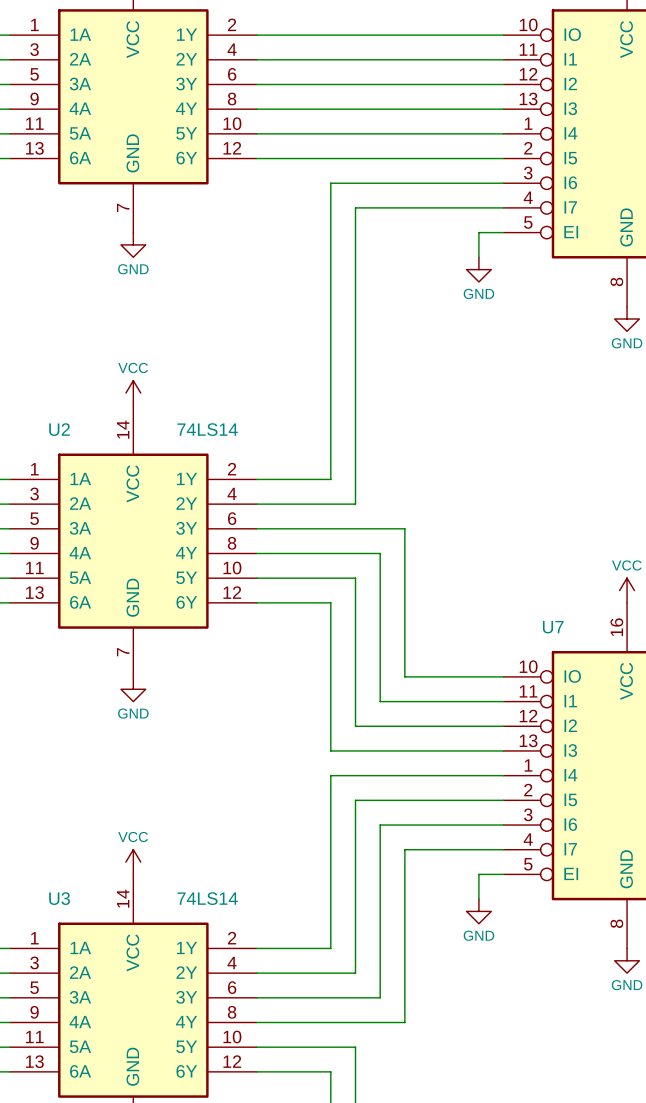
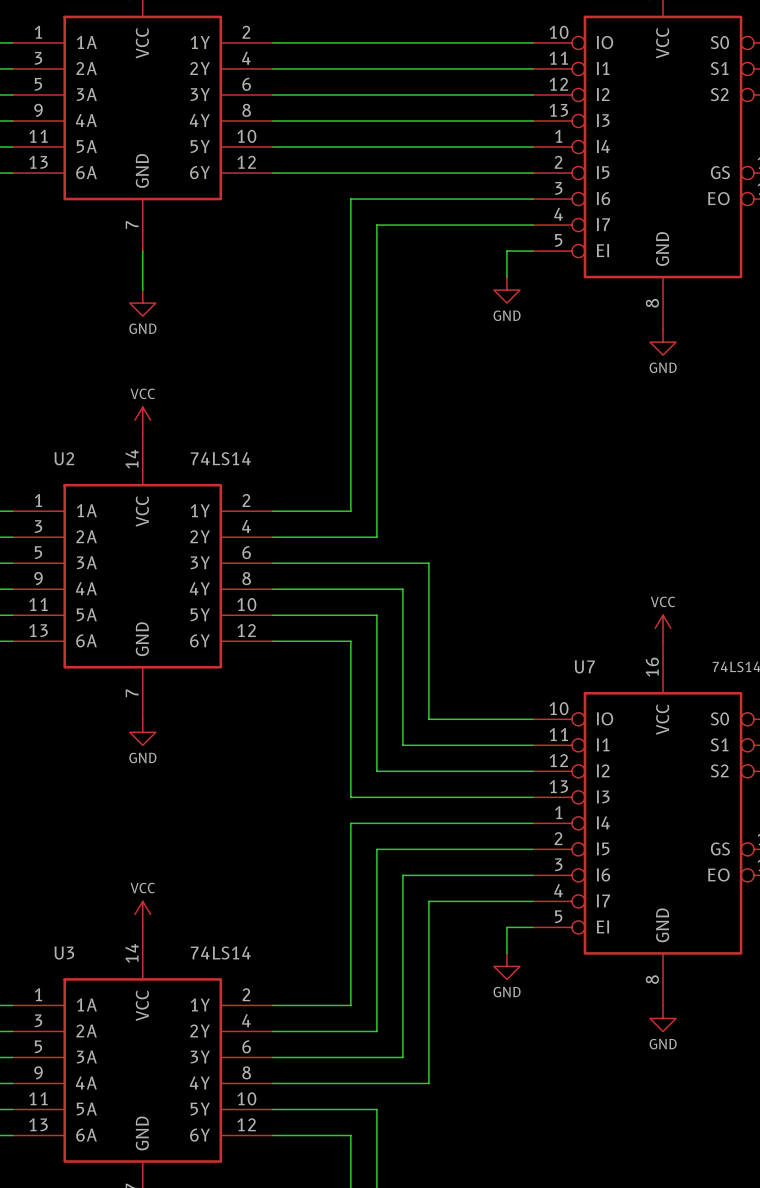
wire: none -> (142, 251) (142, 290)
power symbol position: GND (133, 244) -> GND (142, 303)

